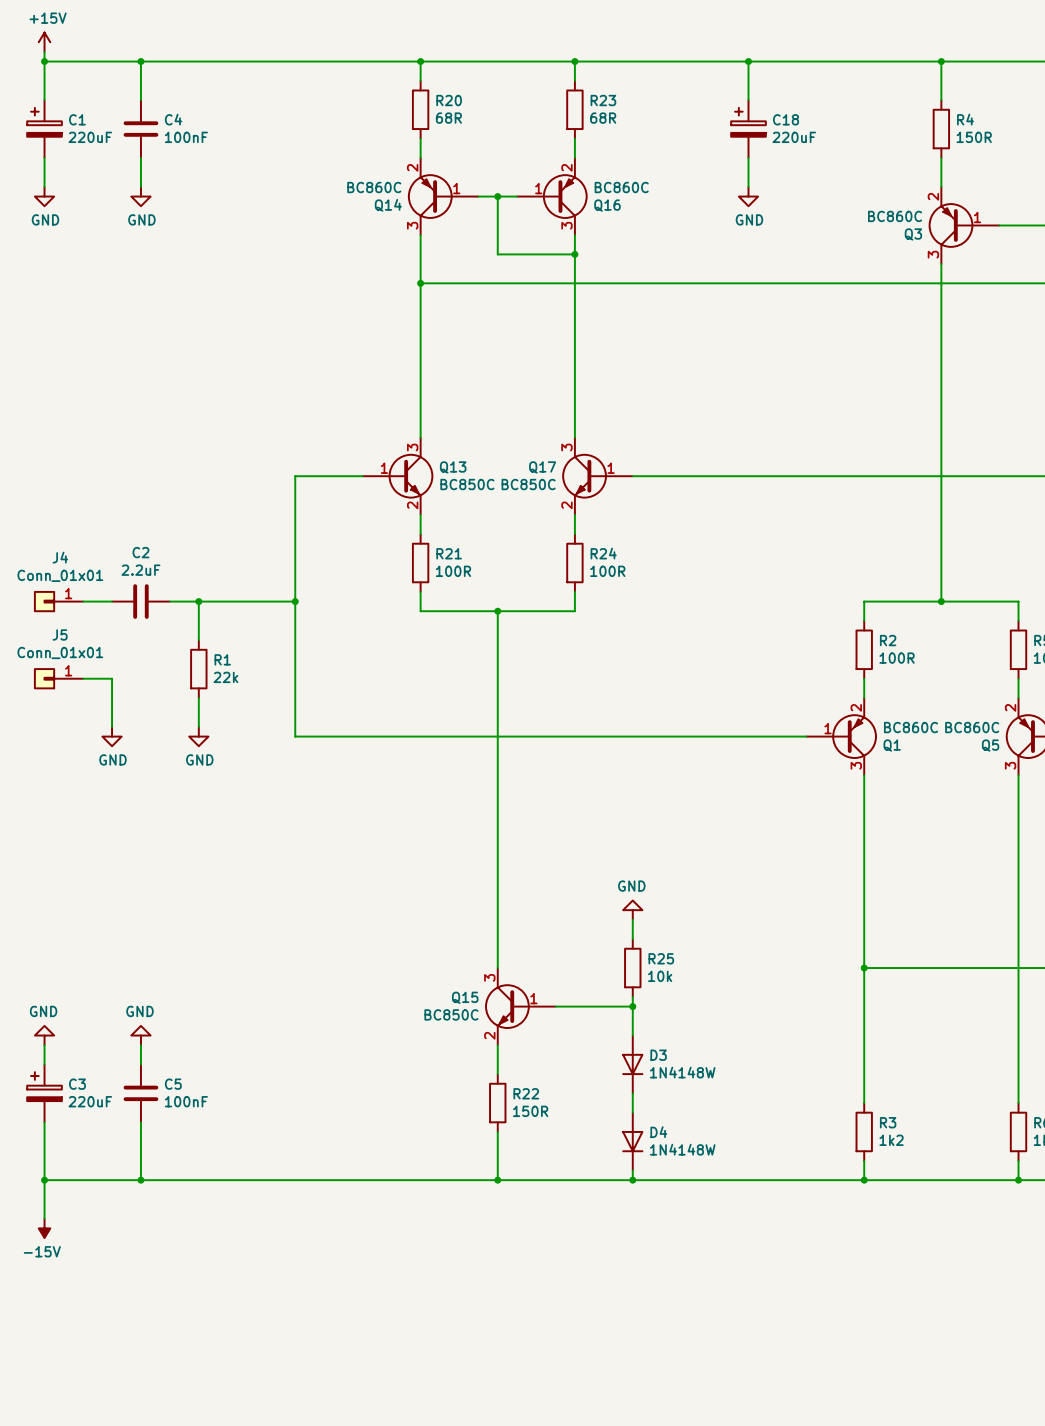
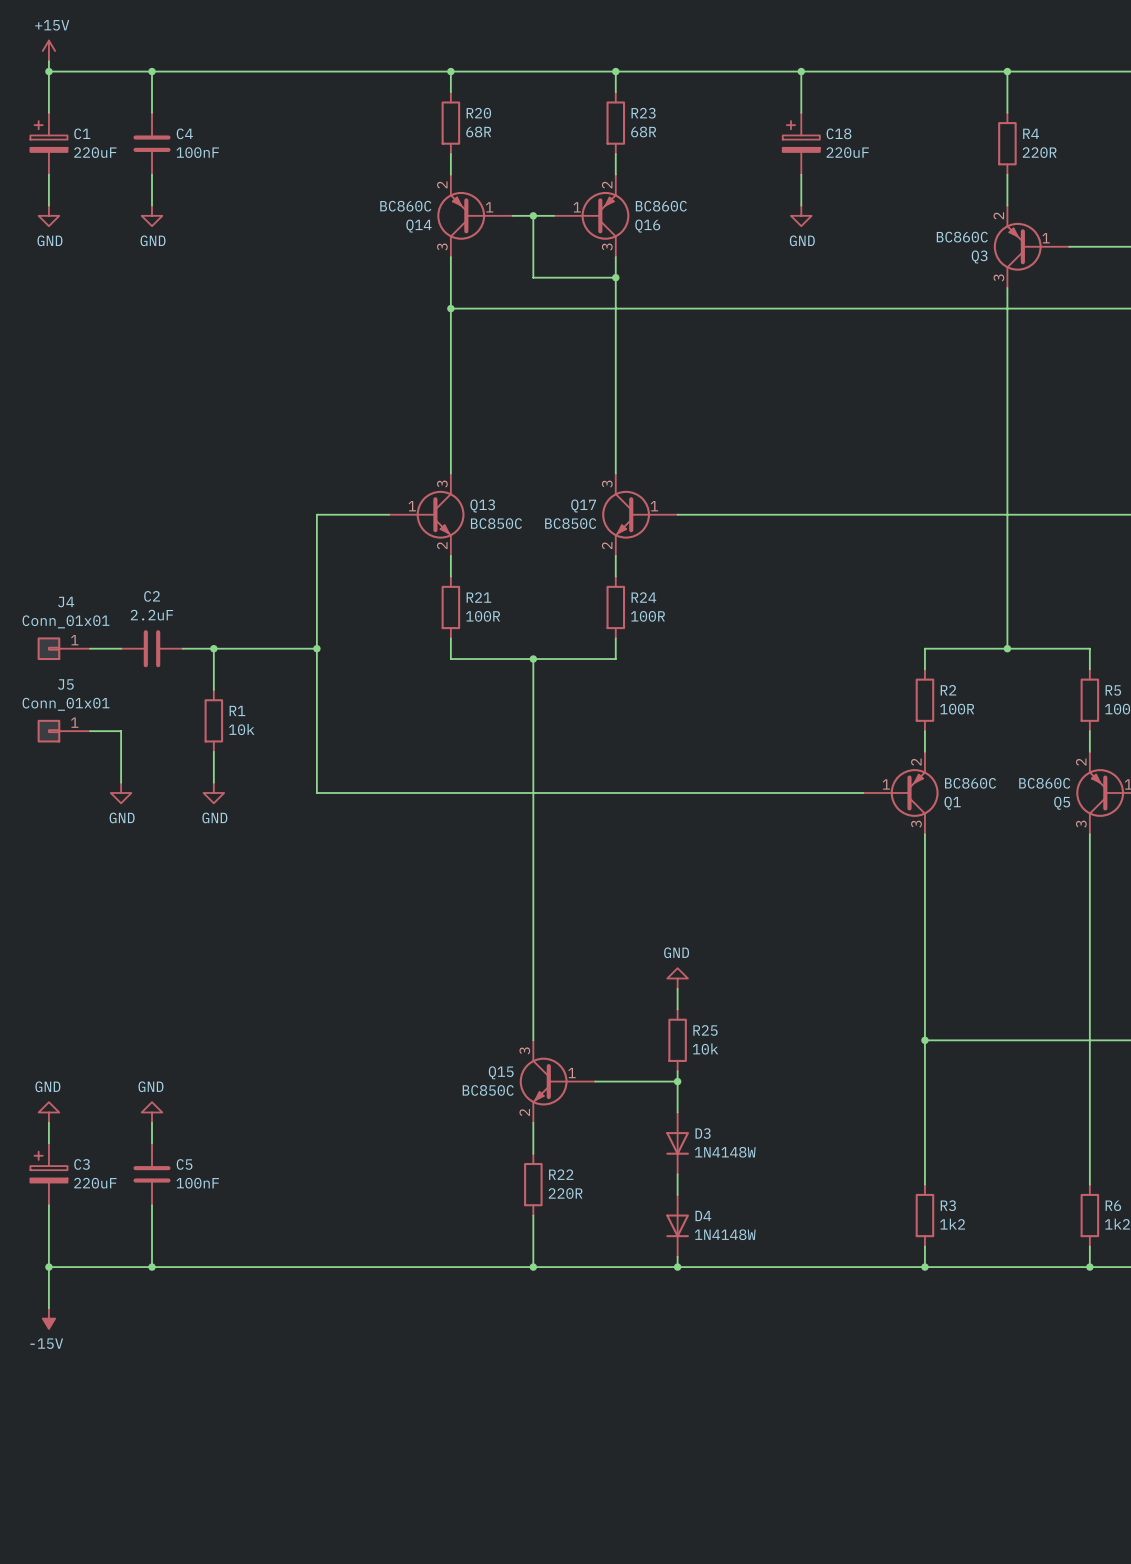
R4 value: 150R (974, 137) -> 220R (1039, 152)
R1 value: 22k (225, 677) -> 10k (241, 729)
R22 value: 150R (530, 1111) -> 220R (565, 1193)

